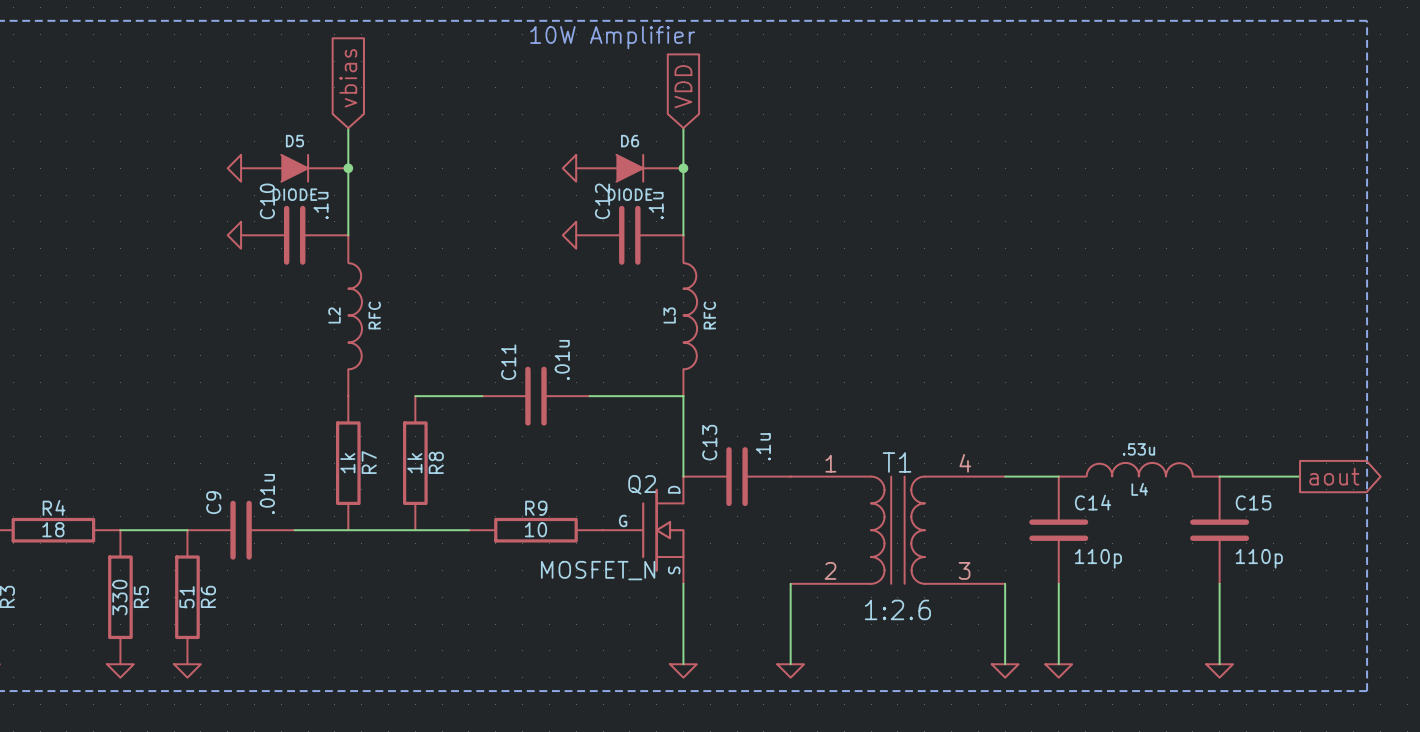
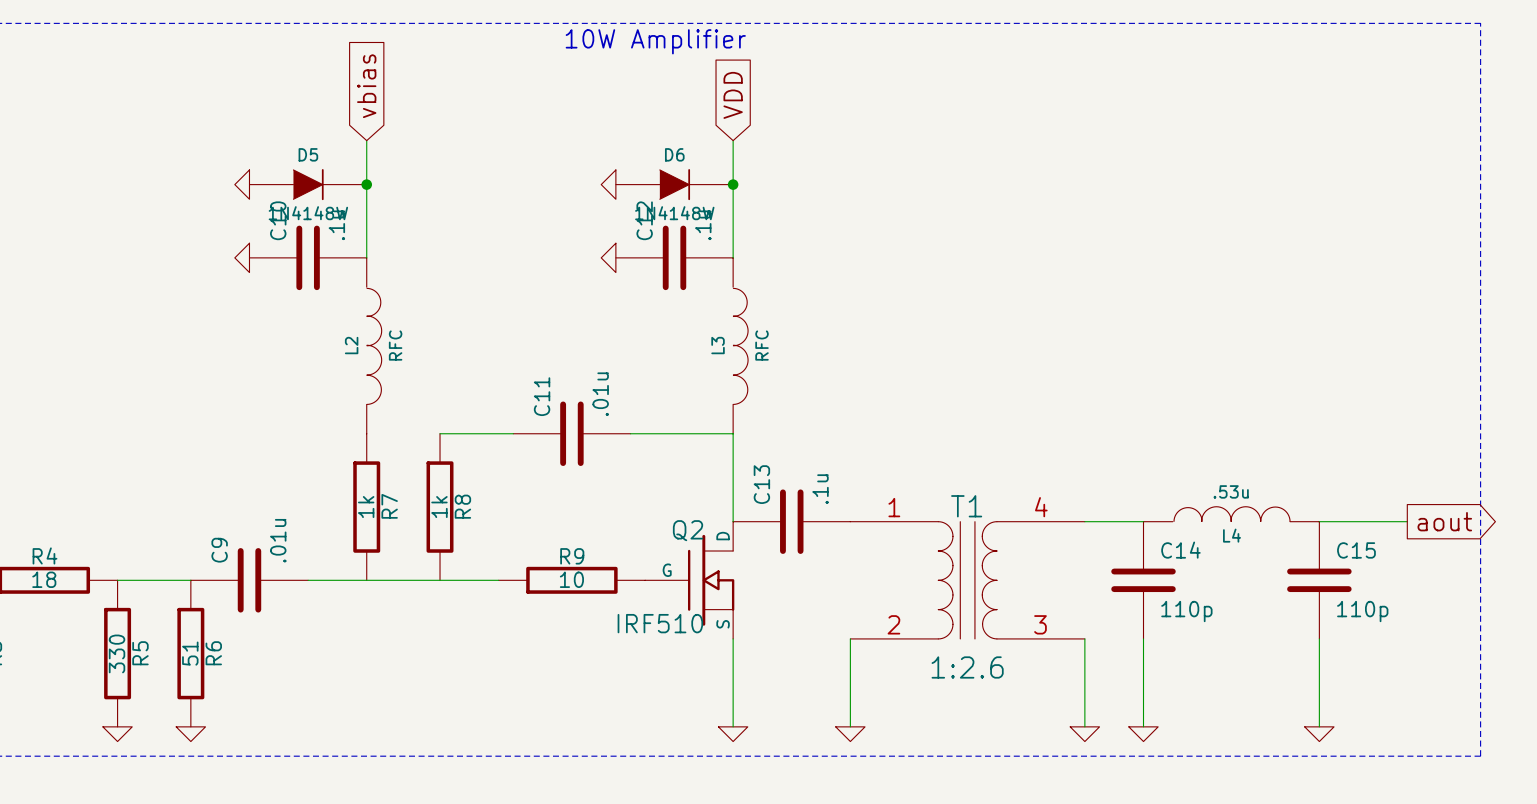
D5 value: DIODE (294, 194) -> 1N4148W (308, 213)
D6 value: DIODE (630, 194) -> 1N4148W (674, 213)
Q2 value: MOSFET_N (598, 570) -> IRF510 (660, 623)

